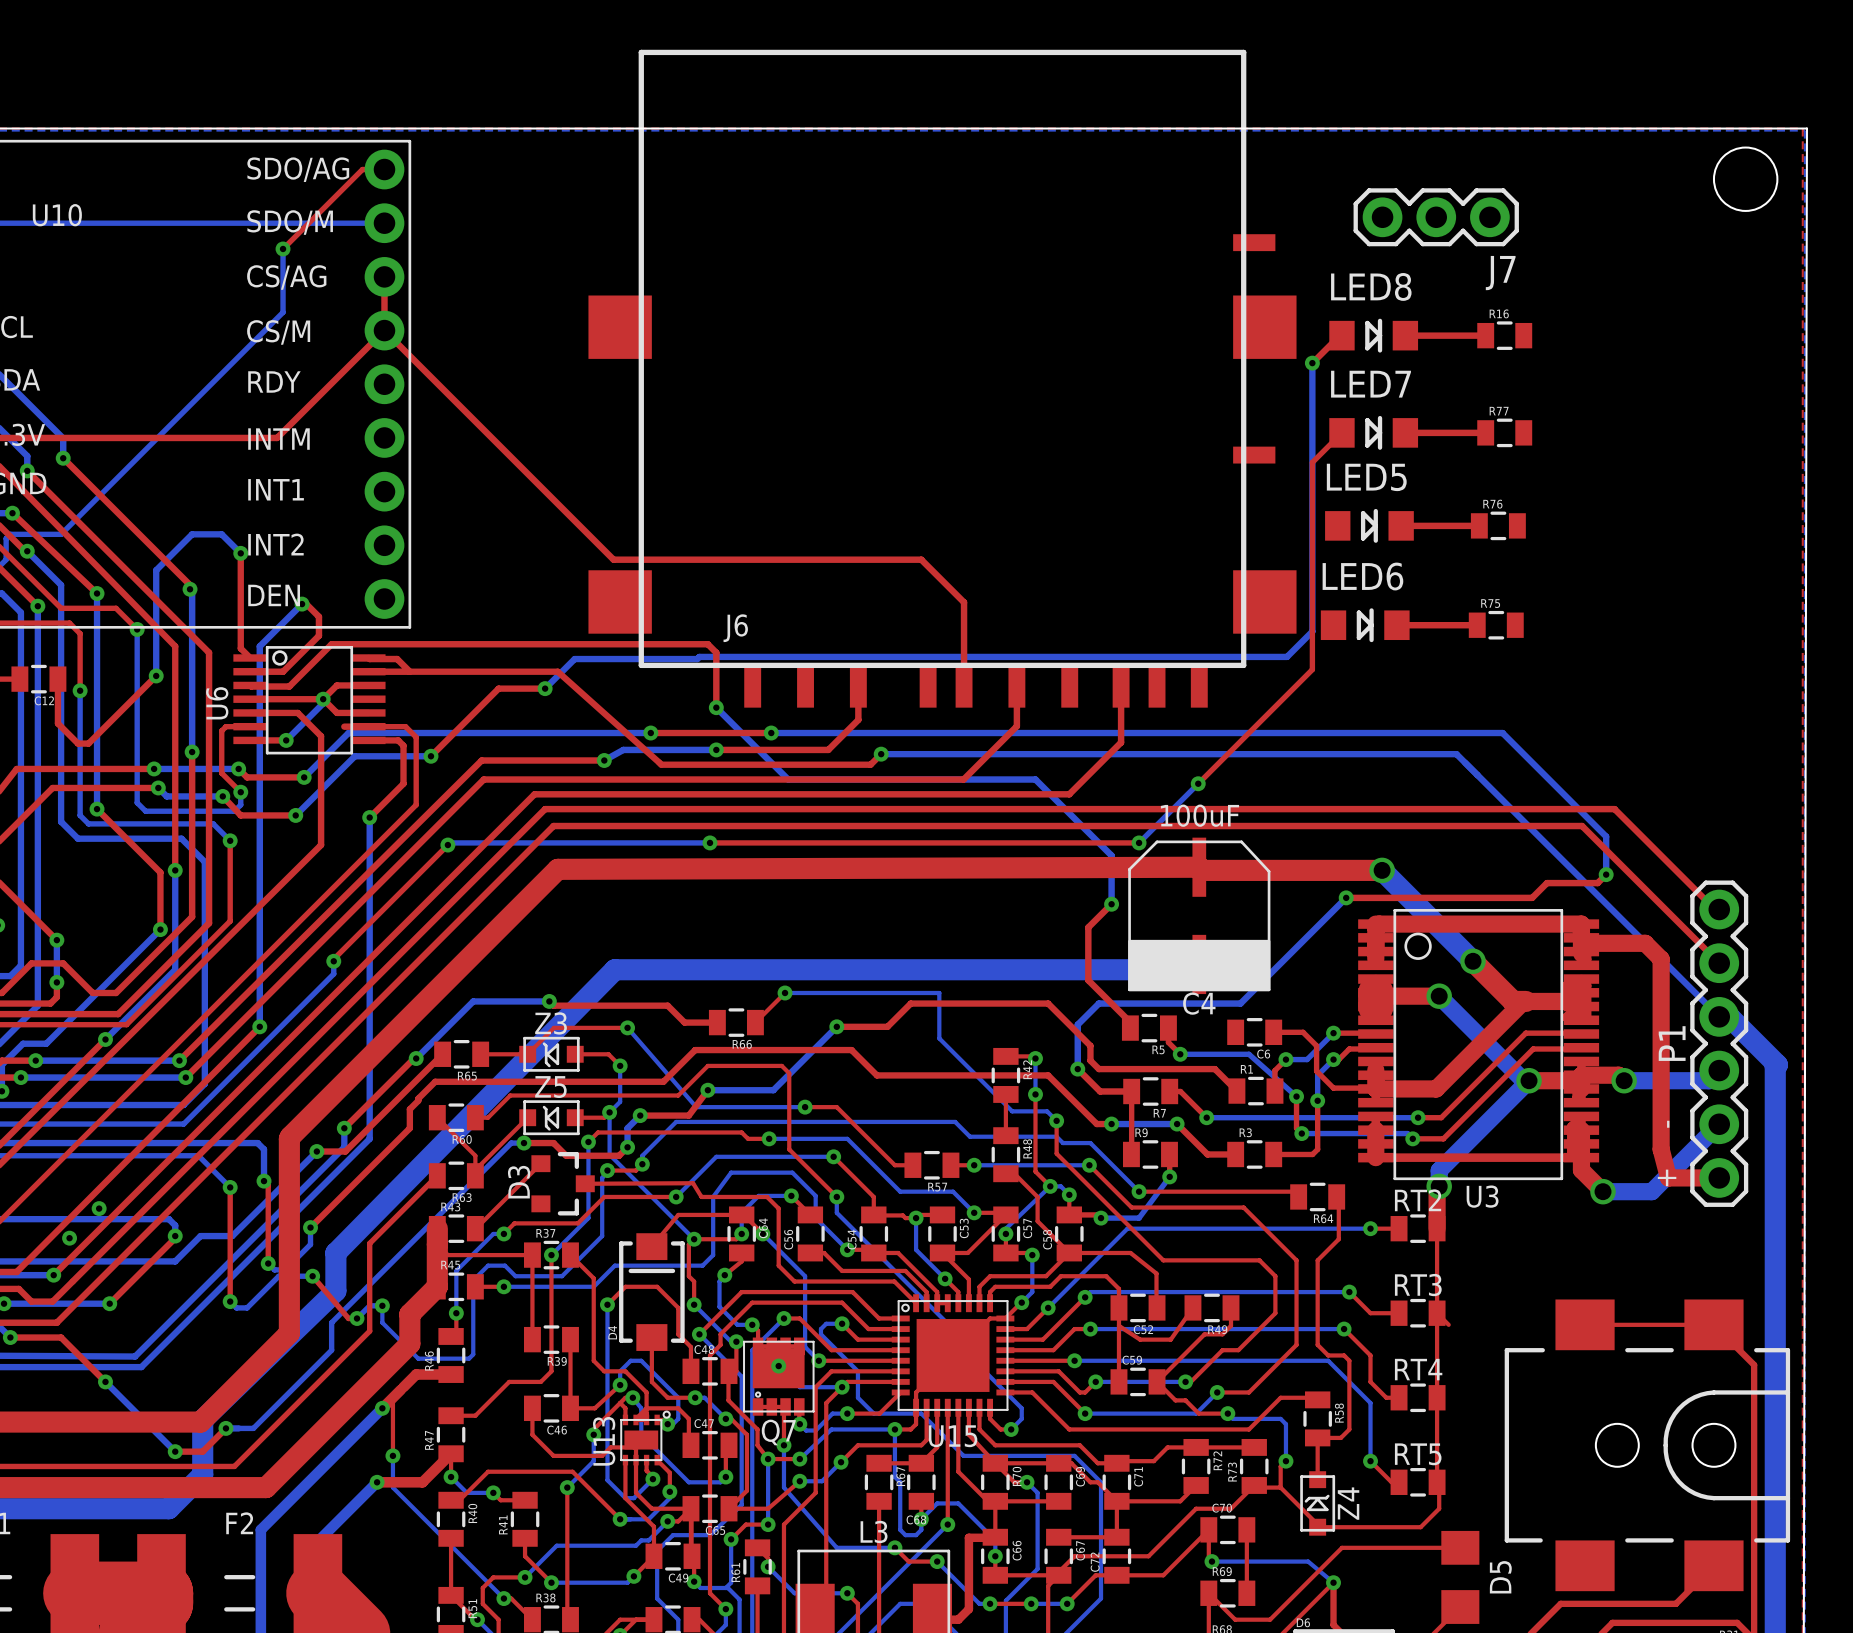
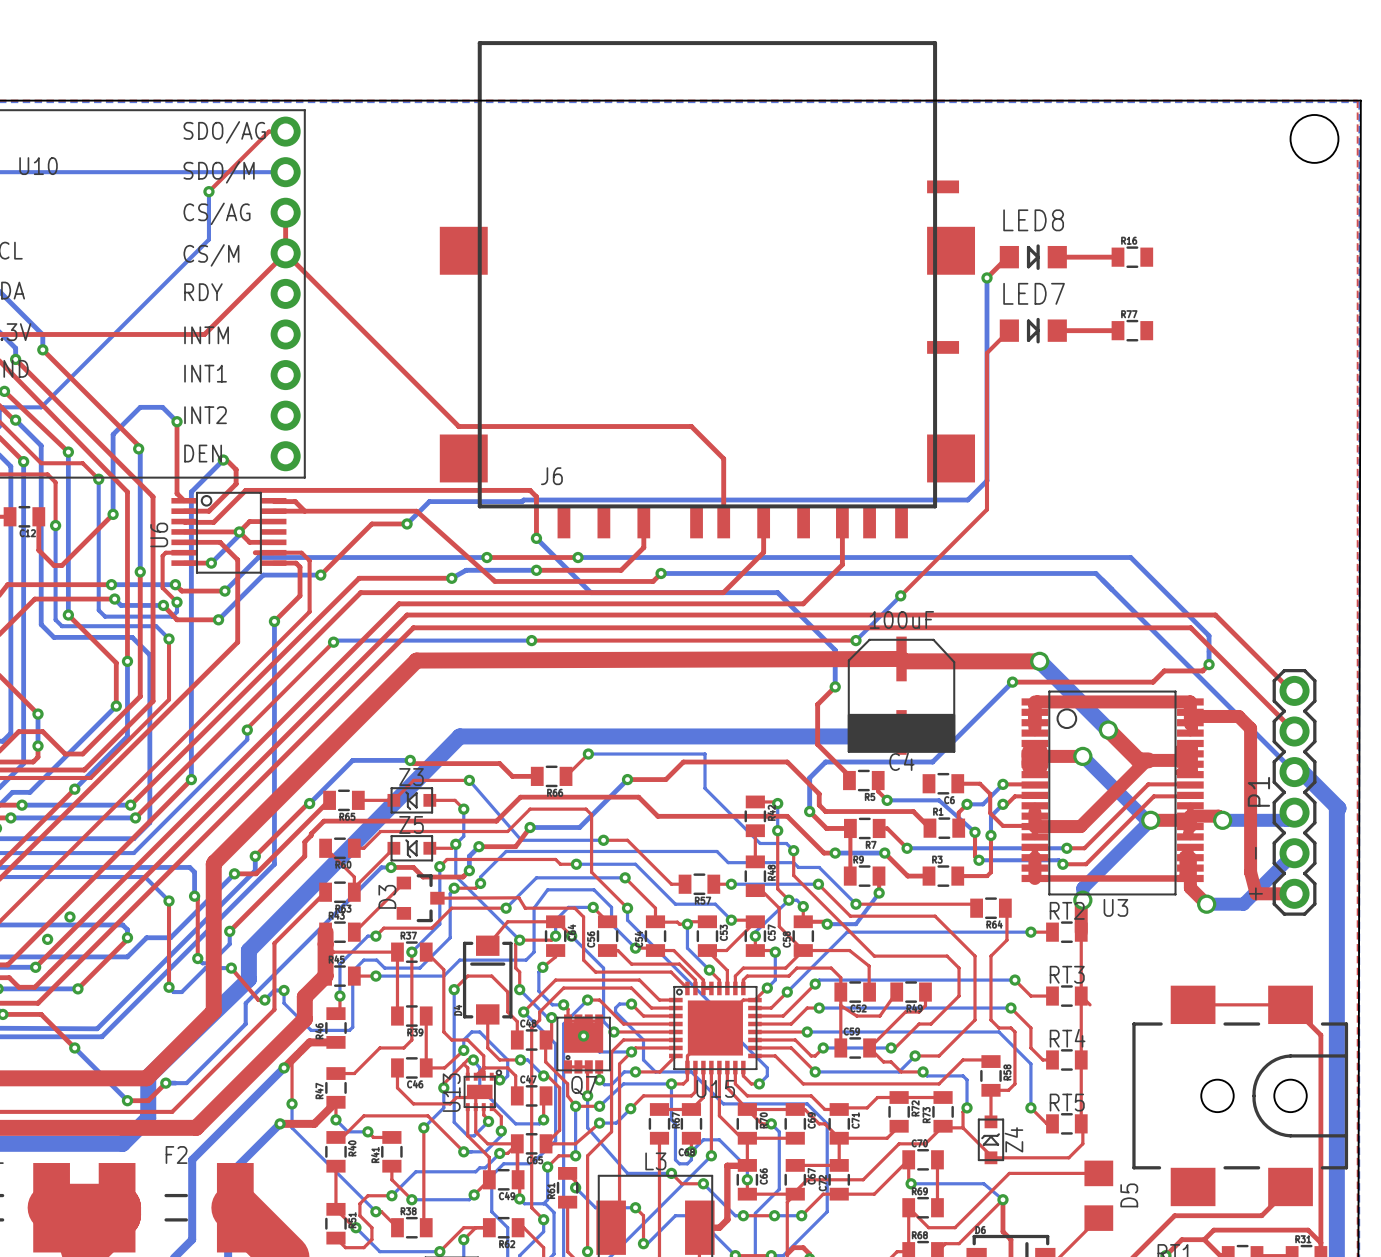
J7: (1436, 217) -> none
LED5: (1369, 525) -> none
top track: (1401, 525) (1479, 525) -> none
R76: (1498, 525) -> none
LED6: (1365, 625) -> none
top track: (1396, 625) (1477, 625) -> none
R75: (1496, 625) -> none

